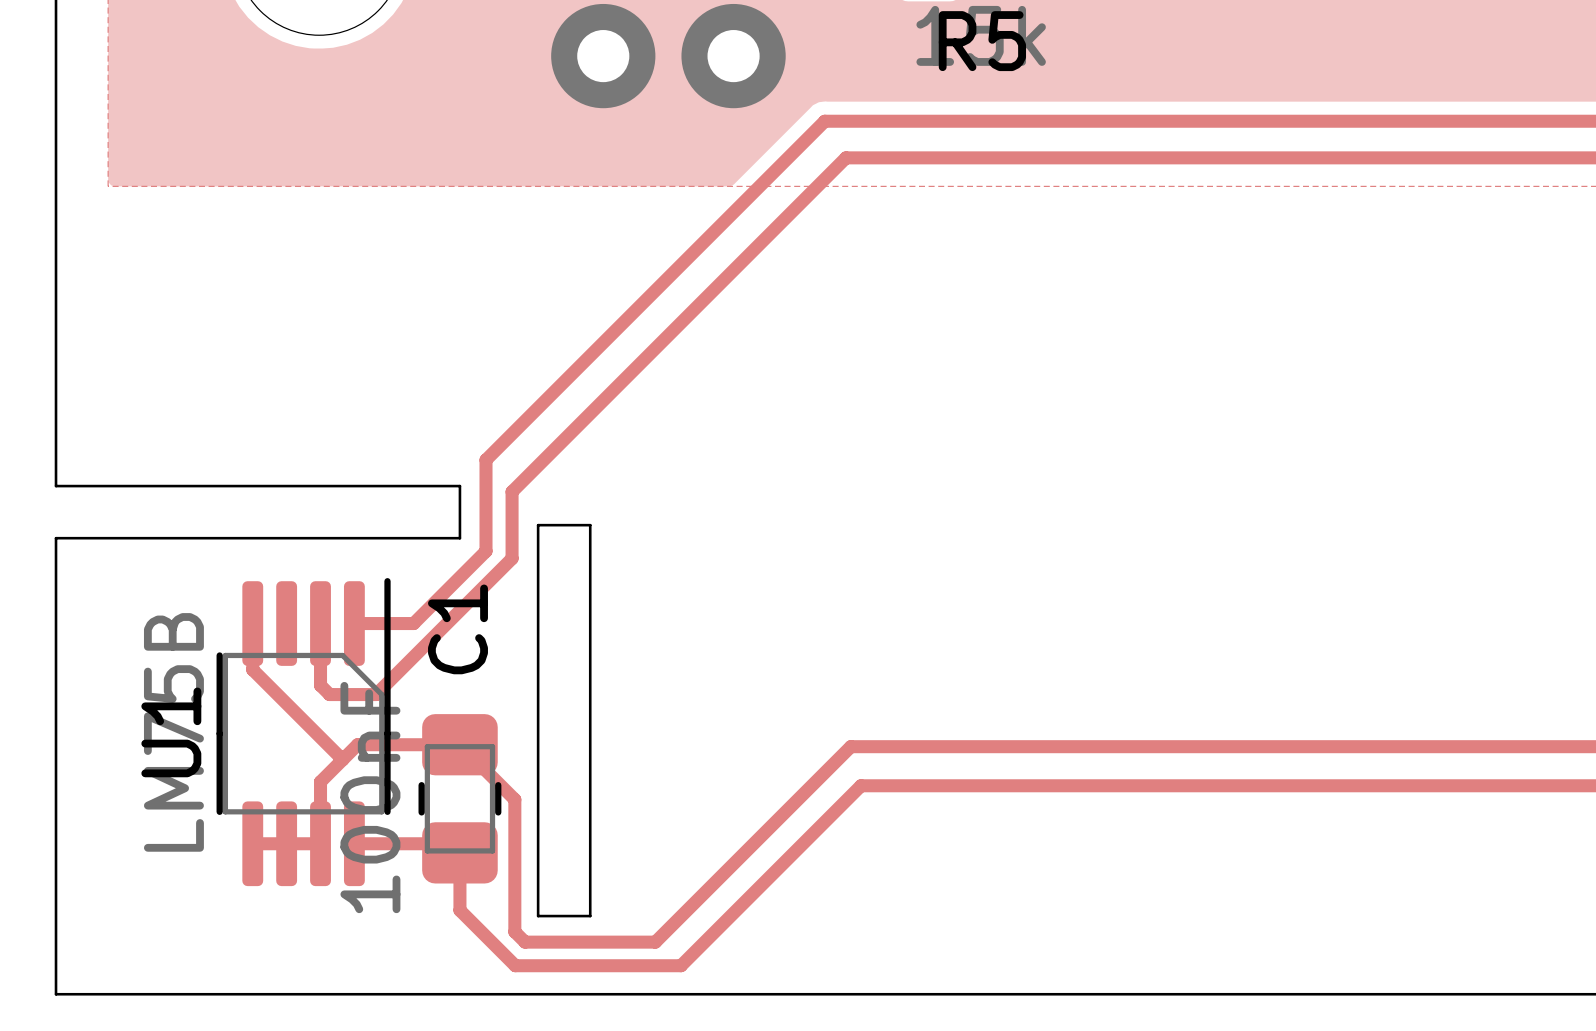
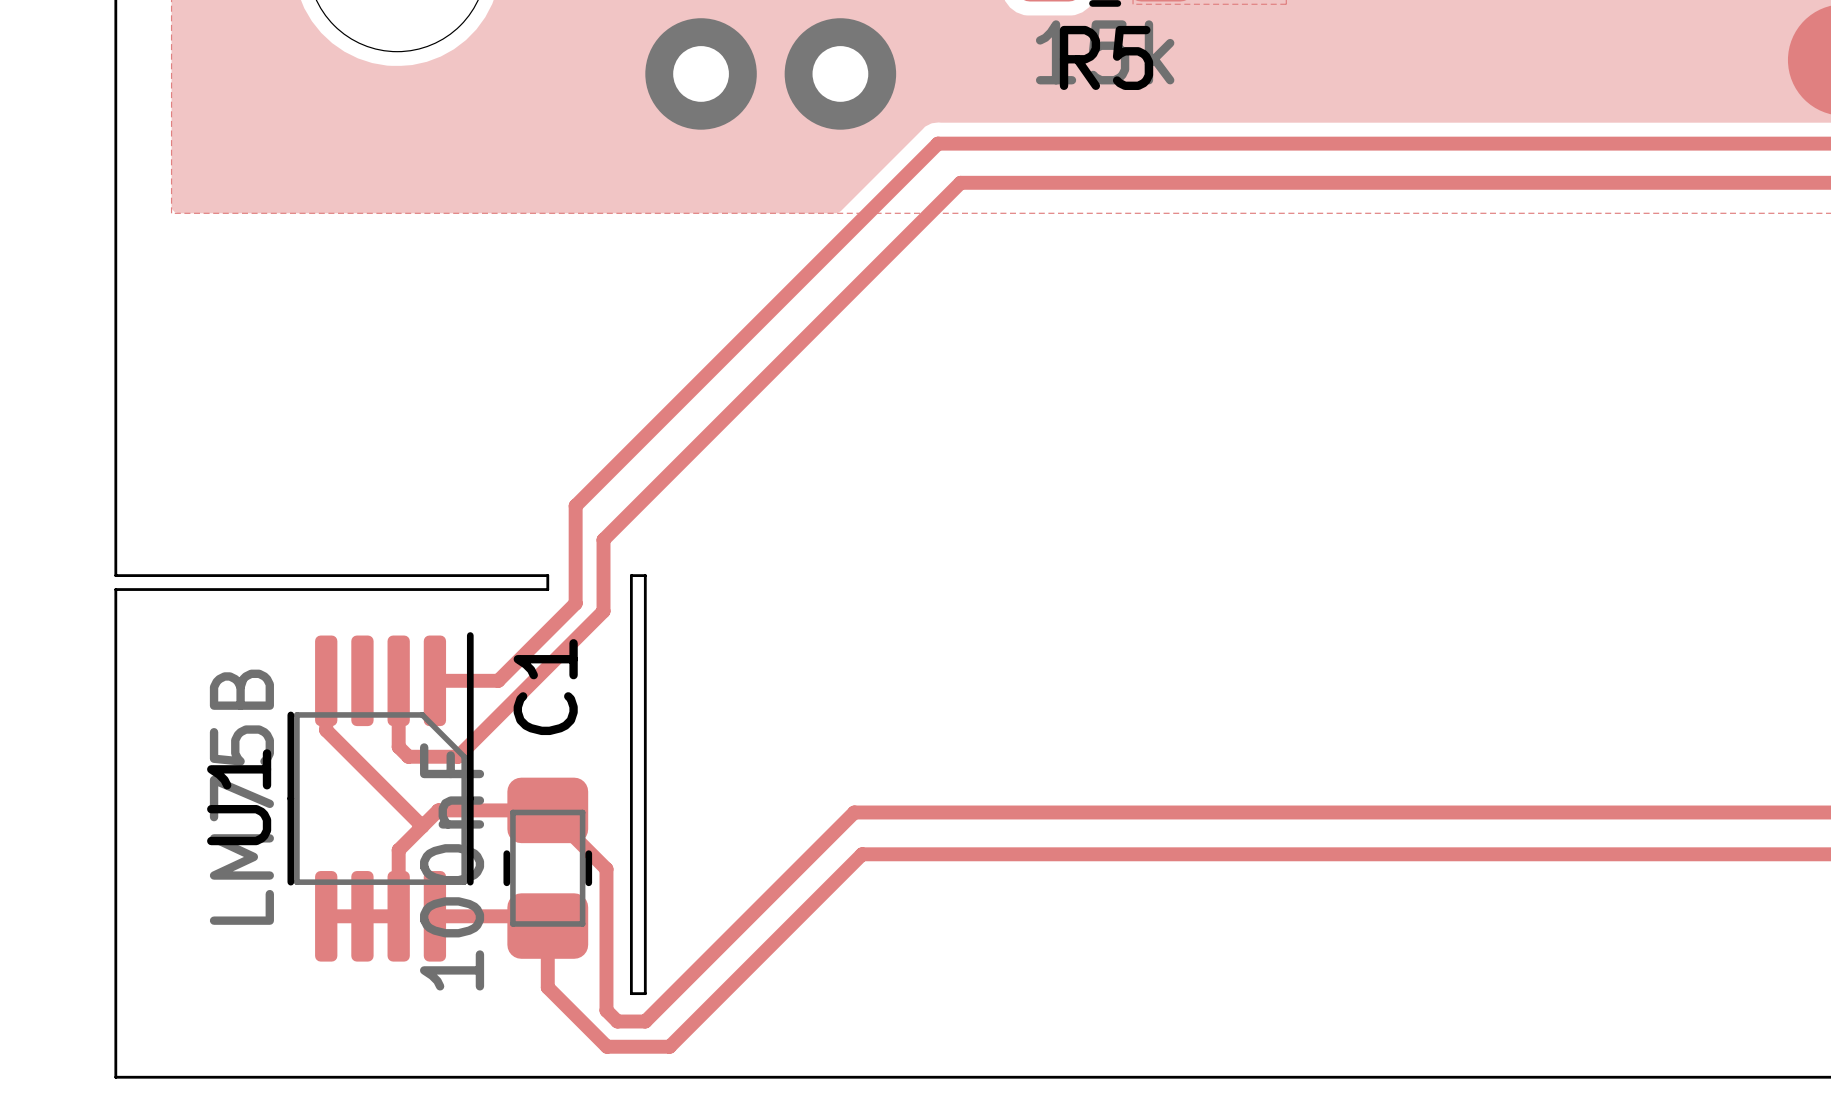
board edge: (56, 486) (459, 486) (459, 525) -> (115, 533) (115, 575) (547, 575)
board edge: (551, 525) (590, 525) (590, 916) (551, 916) -> (645, 575) (645, 993)
track: (850, 746) (655, 942) (551, 942) -> (965, 812) (854, 812) (645, 1021)
track: (861, 785) (681, 965) (573, 965) -> (976, 854) (862, 854) (669, 1046)

